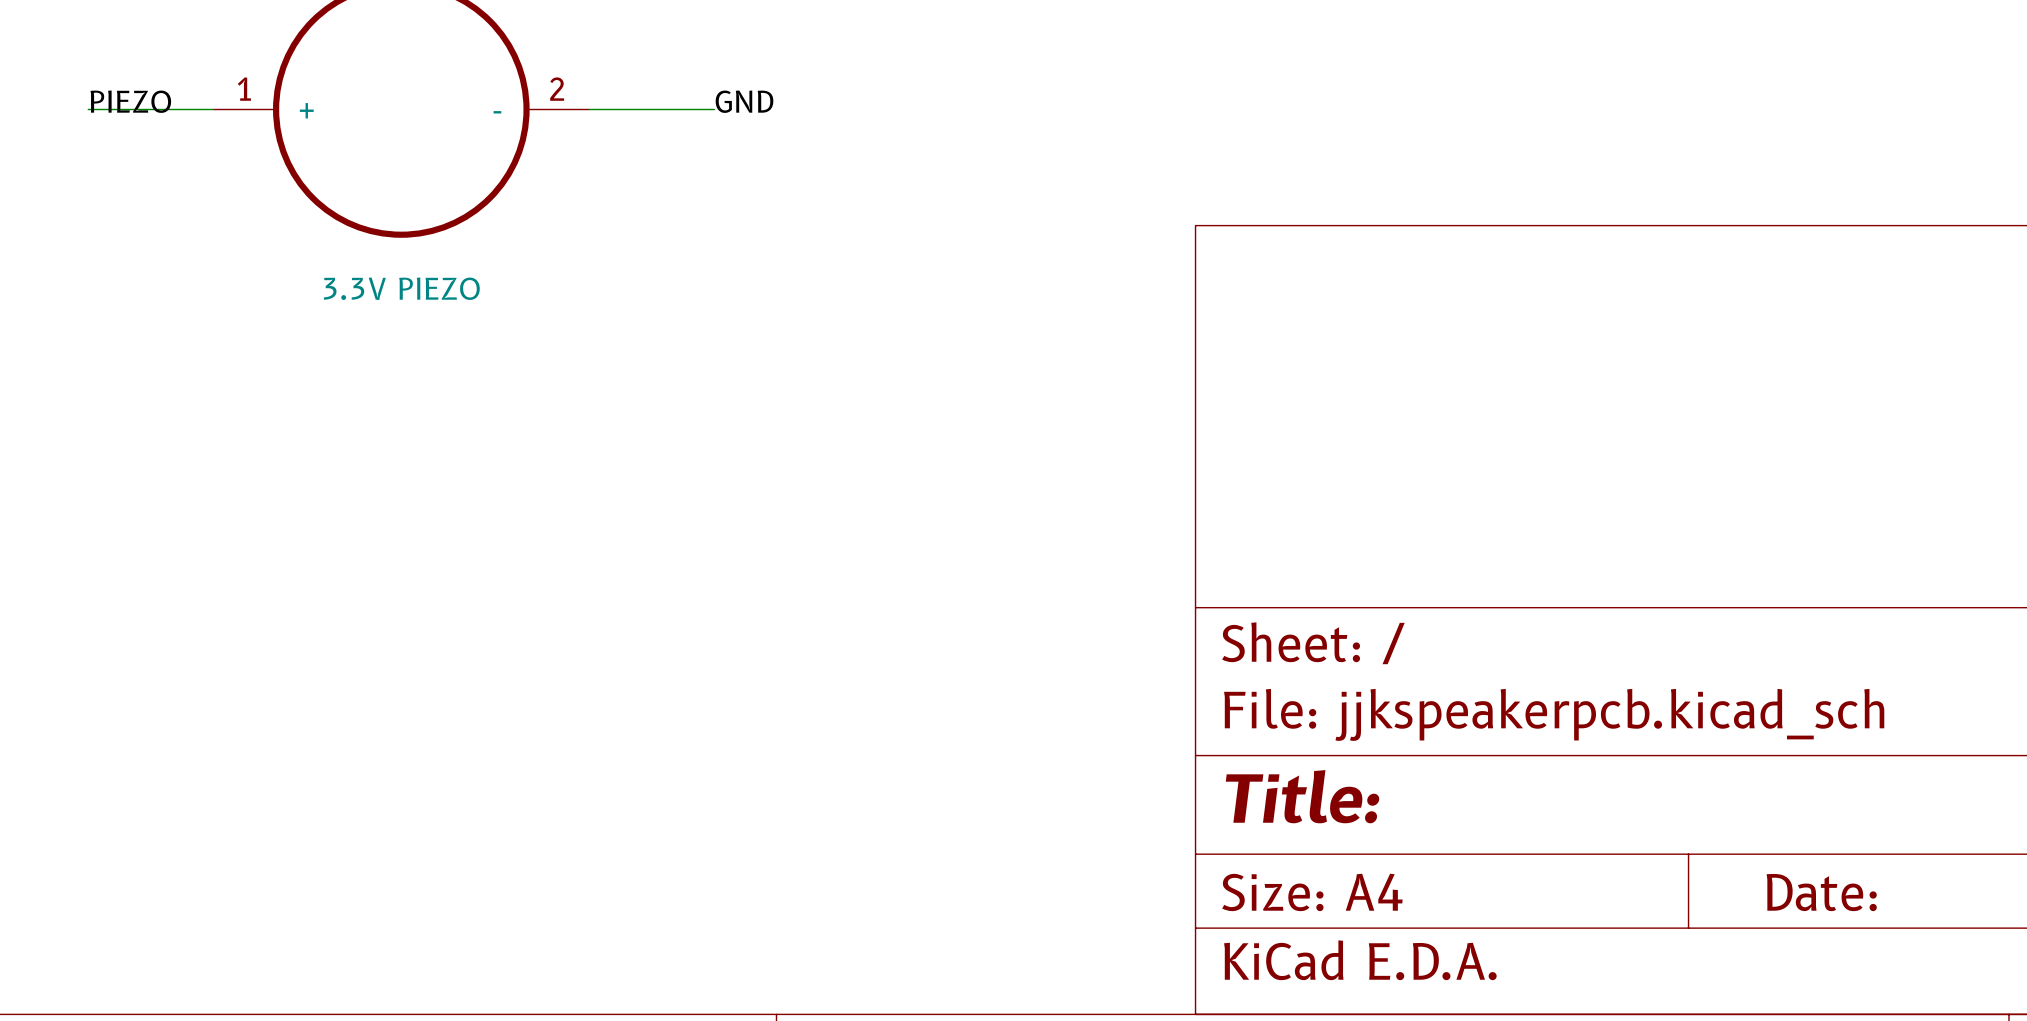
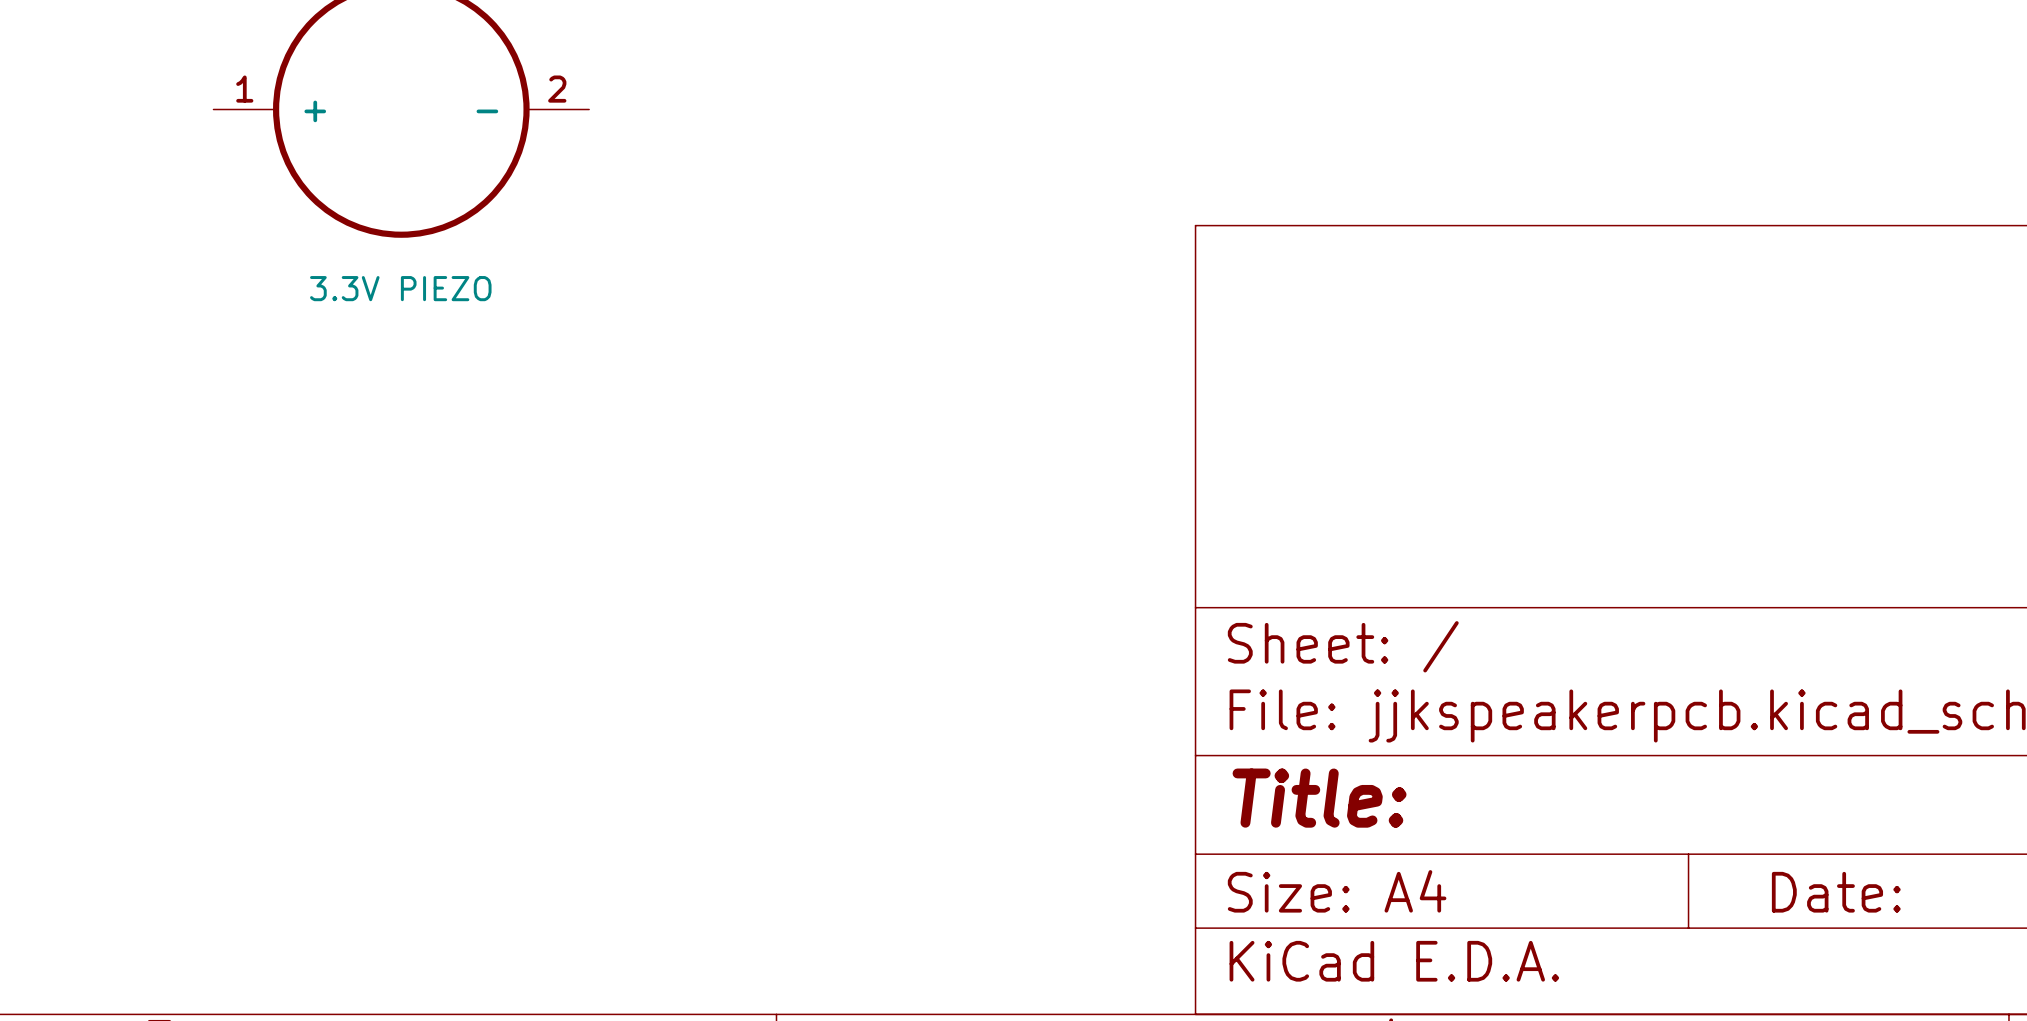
label: PIEZO (130, 101) -> none
label: GND (744, 101) -> none
wire: (88, 109) (213, 109) -> none
wire: (589, 109) (714, 109) -> none

